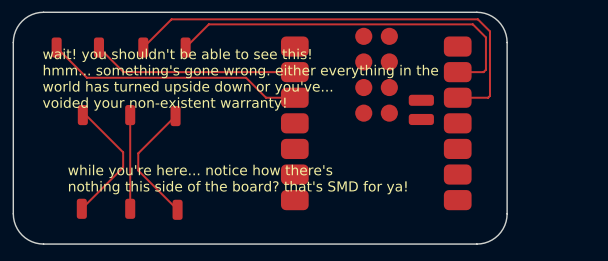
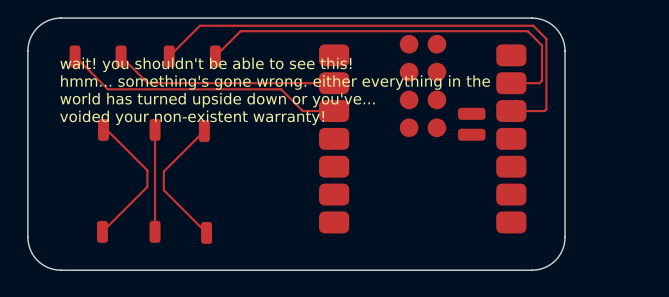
text: while you're here... notice how there's (200, 171) -> none
text: nothing this side of the board? that's SMD for ya! (237, 187) -> none

